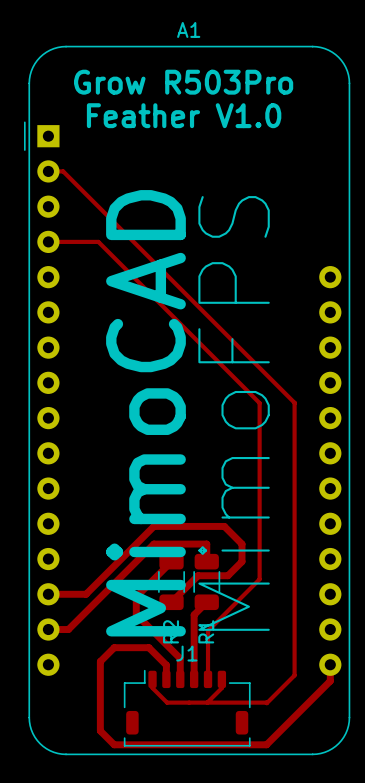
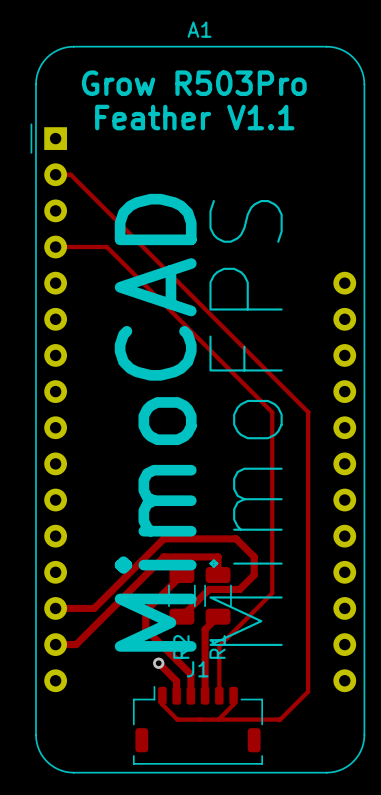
text: Feather V1.0 (184, 115) -> Feather V1.1 (194, 117)
track: (148, 647) (114, 647) (100, 661) (100, 730) (114, 744) (266, 744) (330, 681) (330, 664) -> none
via: none -> (158, 663)

